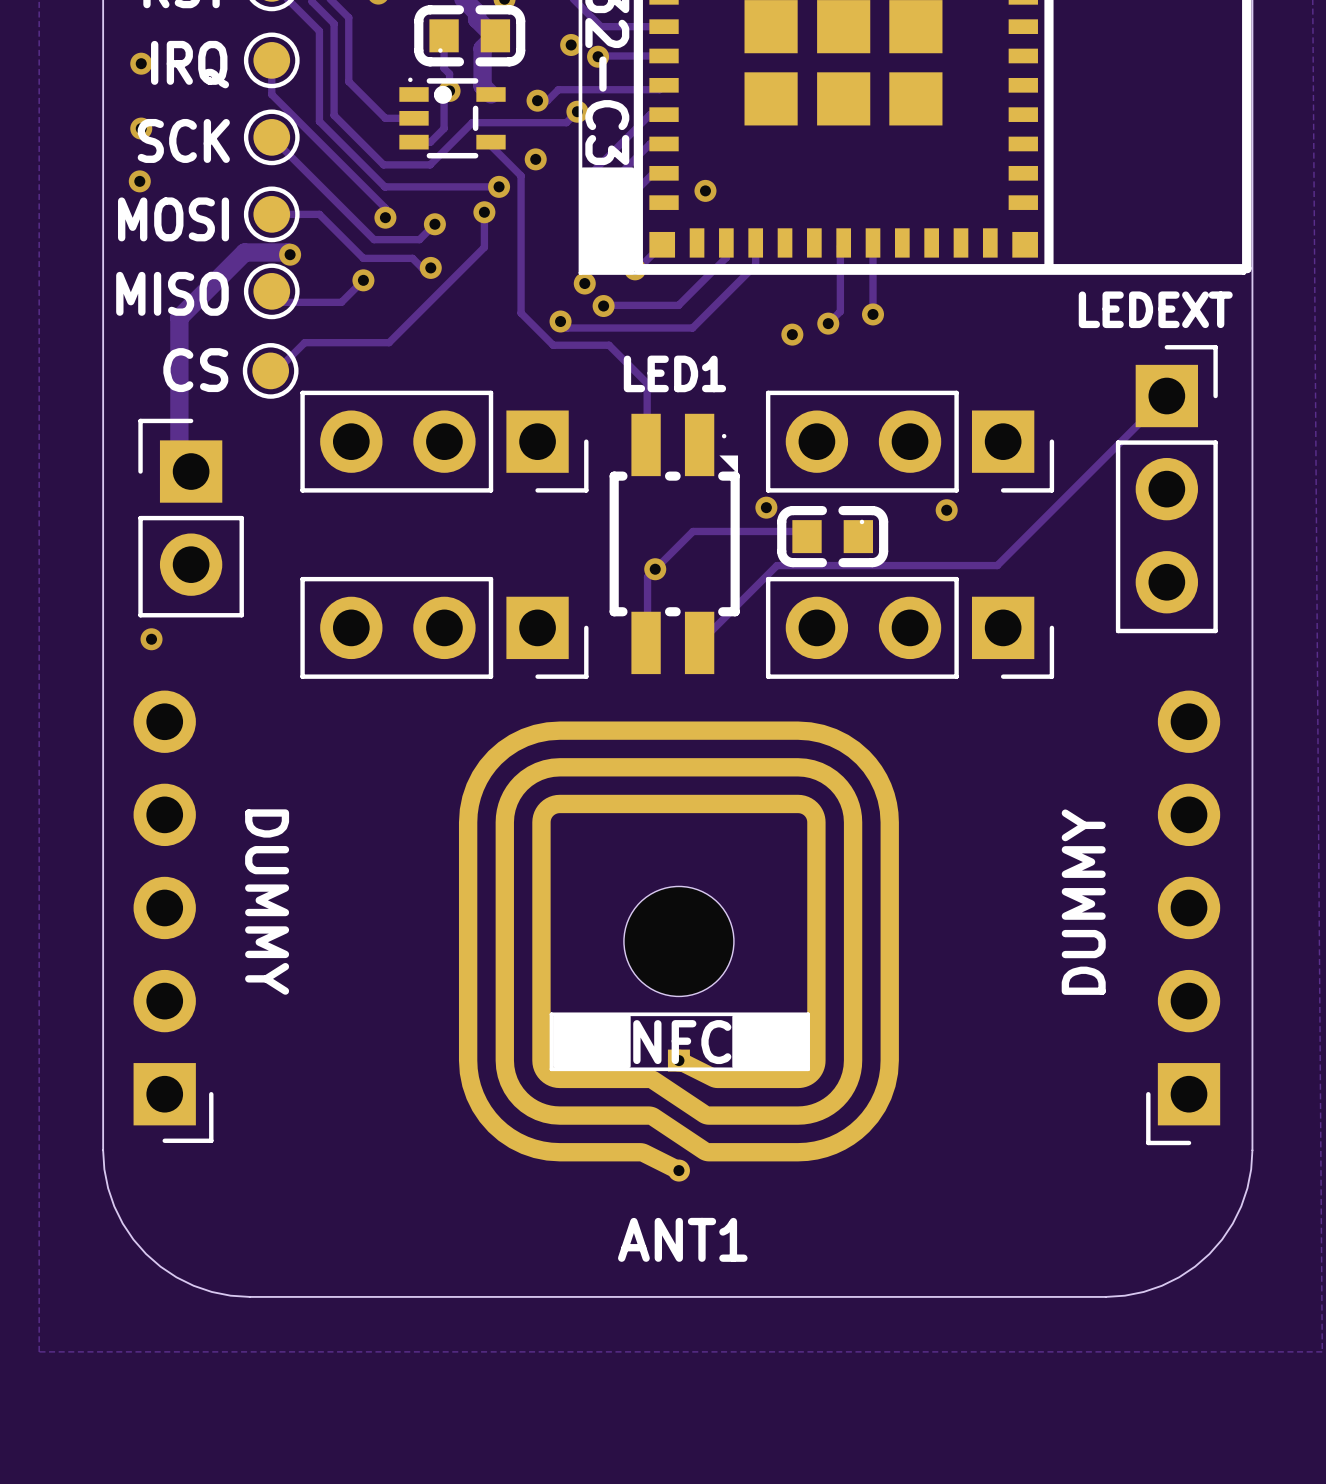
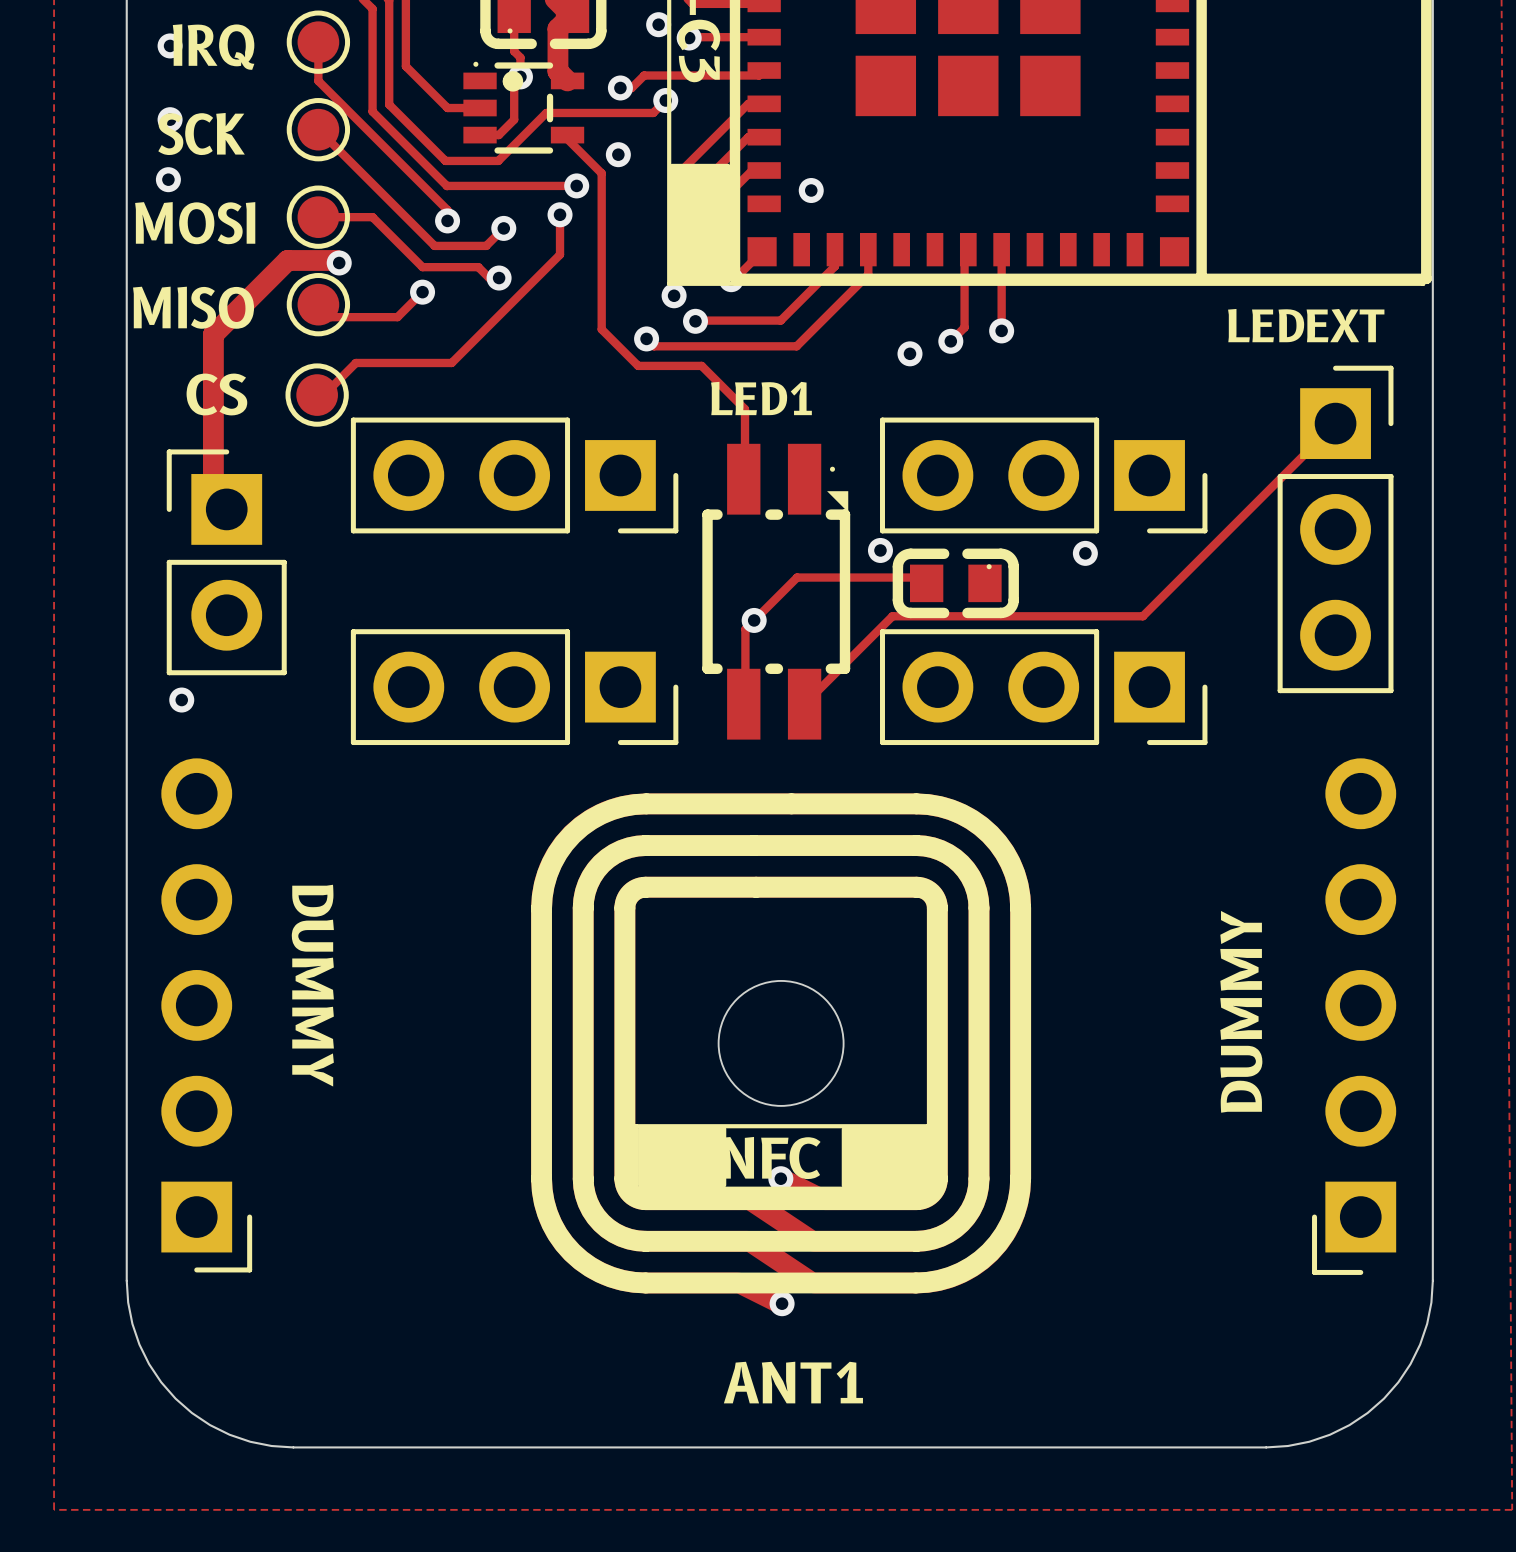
part footprint: [458, 721, 899, 1182] -> [531, 793, 1032, 1315]
via: none -> (780, 1178)
via: none -> (782, 1303)

